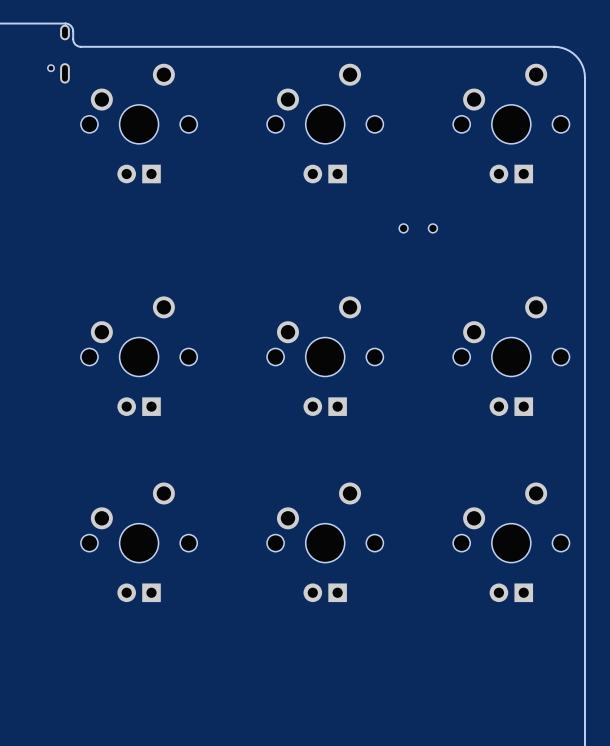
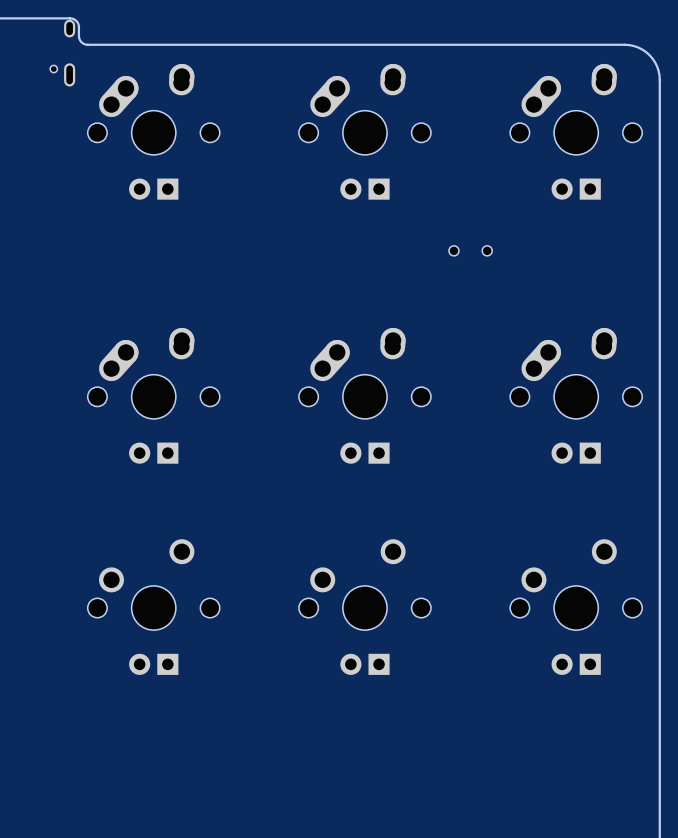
part footprint: [80, 63, 198, 184] -> [87, 63, 220, 200]
part footprint: [267, 63, 384, 184] -> [298, 63, 431, 200]
part footprint: [453, 63, 570, 184] -> [510, 63, 643, 200]
part footprint: [80, 296, 198, 416] -> [87, 328, 220, 464]
part footprint: [267, 296, 384, 416] -> [298, 328, 431, 464]
part footprint: [453, 296, 570, 416] -> [510, 328, 643, 464]

